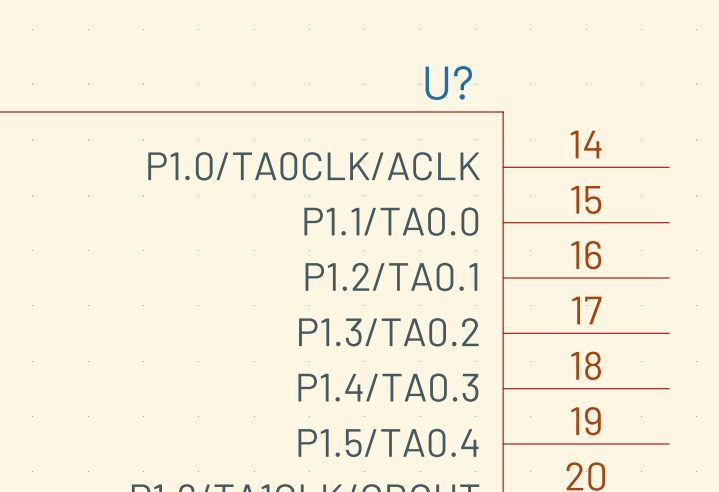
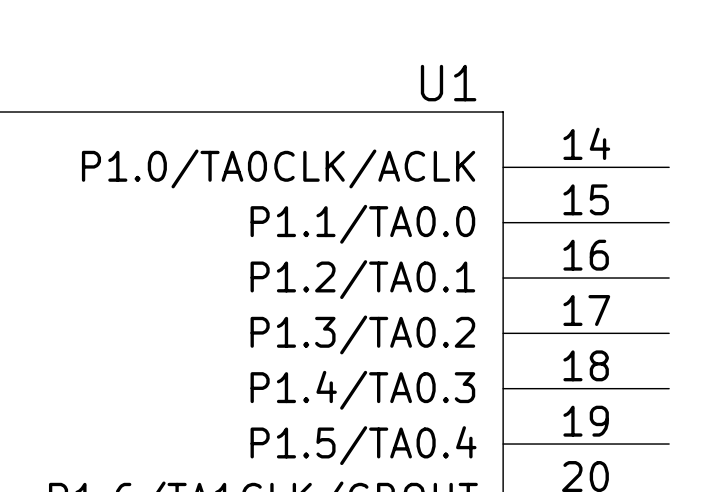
U? name: U? (448, 83) -> U1 (448, 83)

